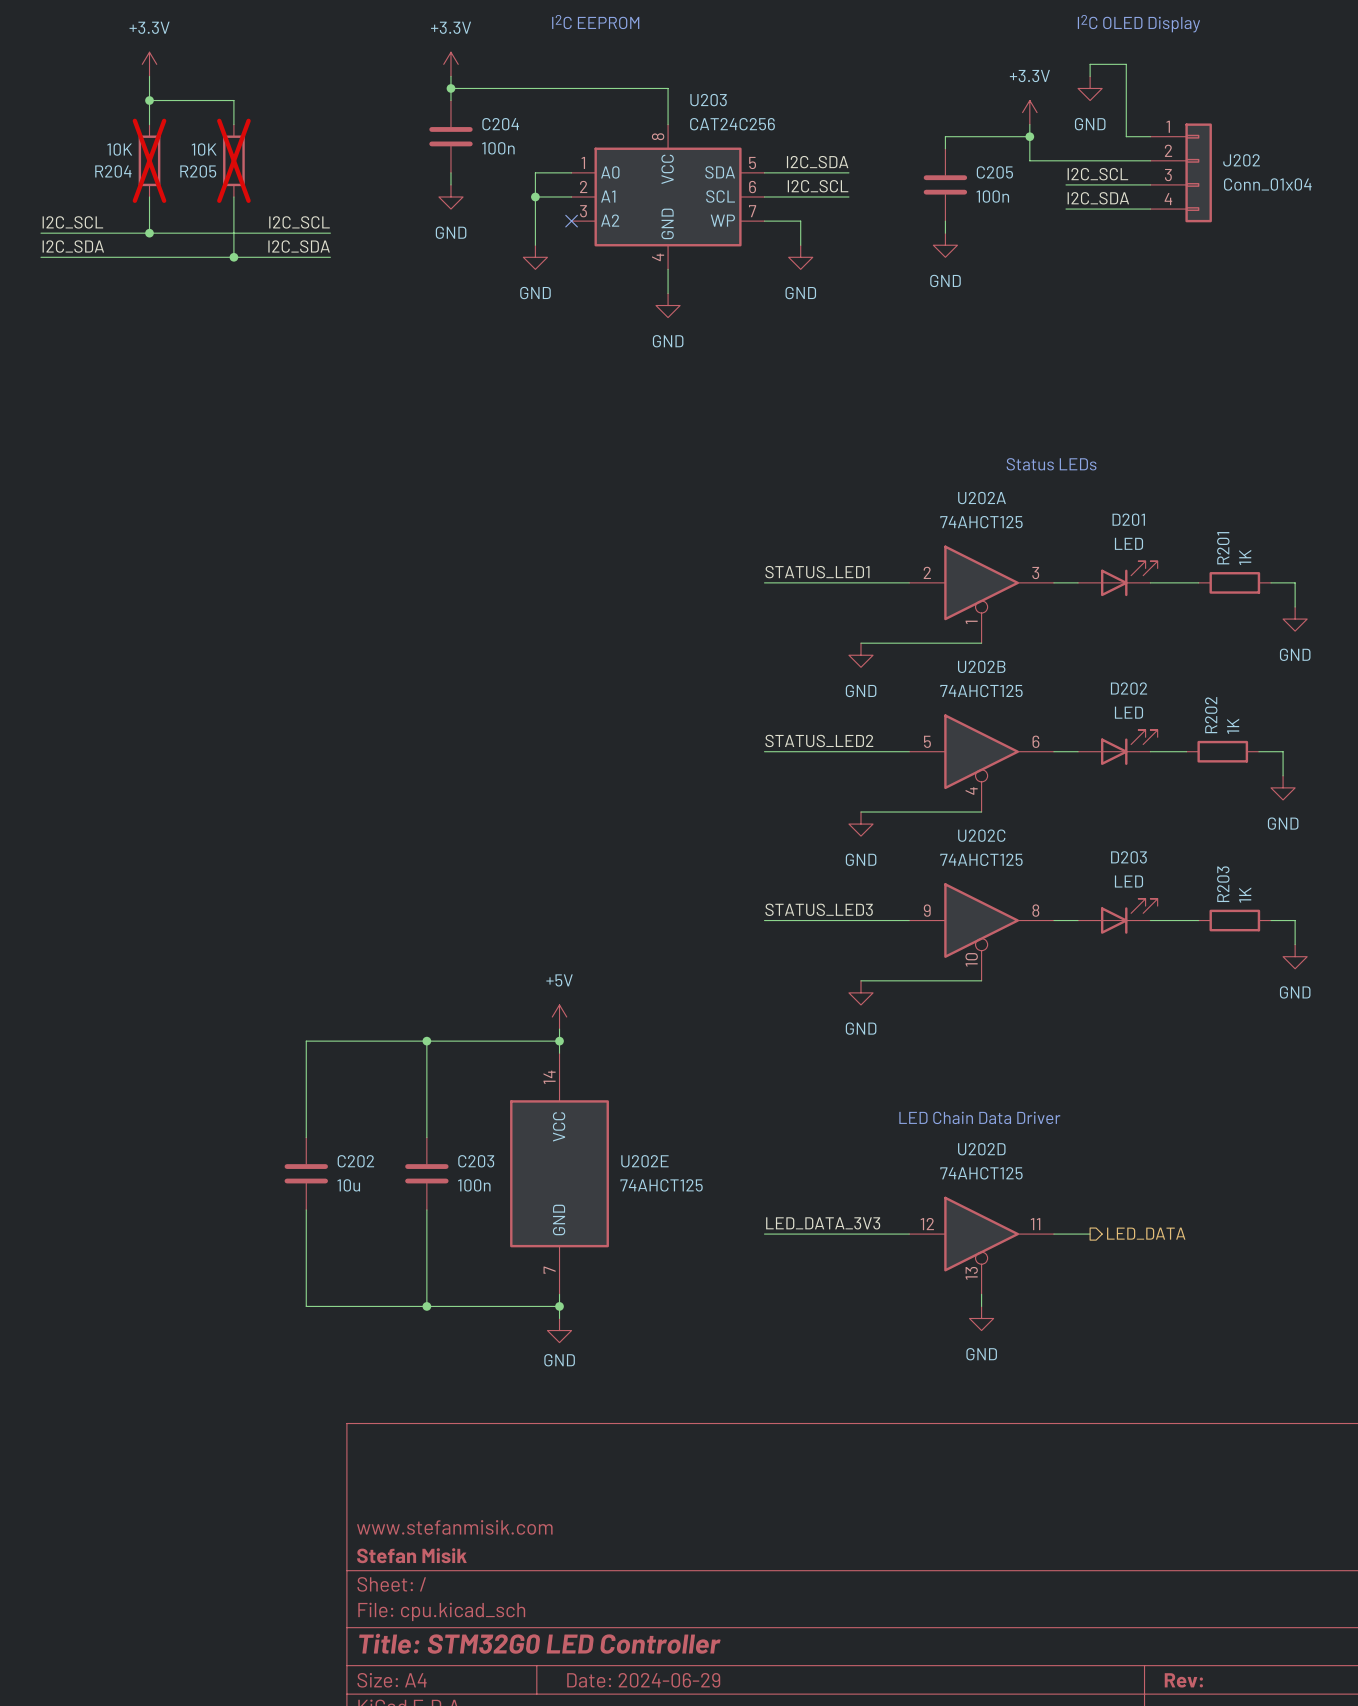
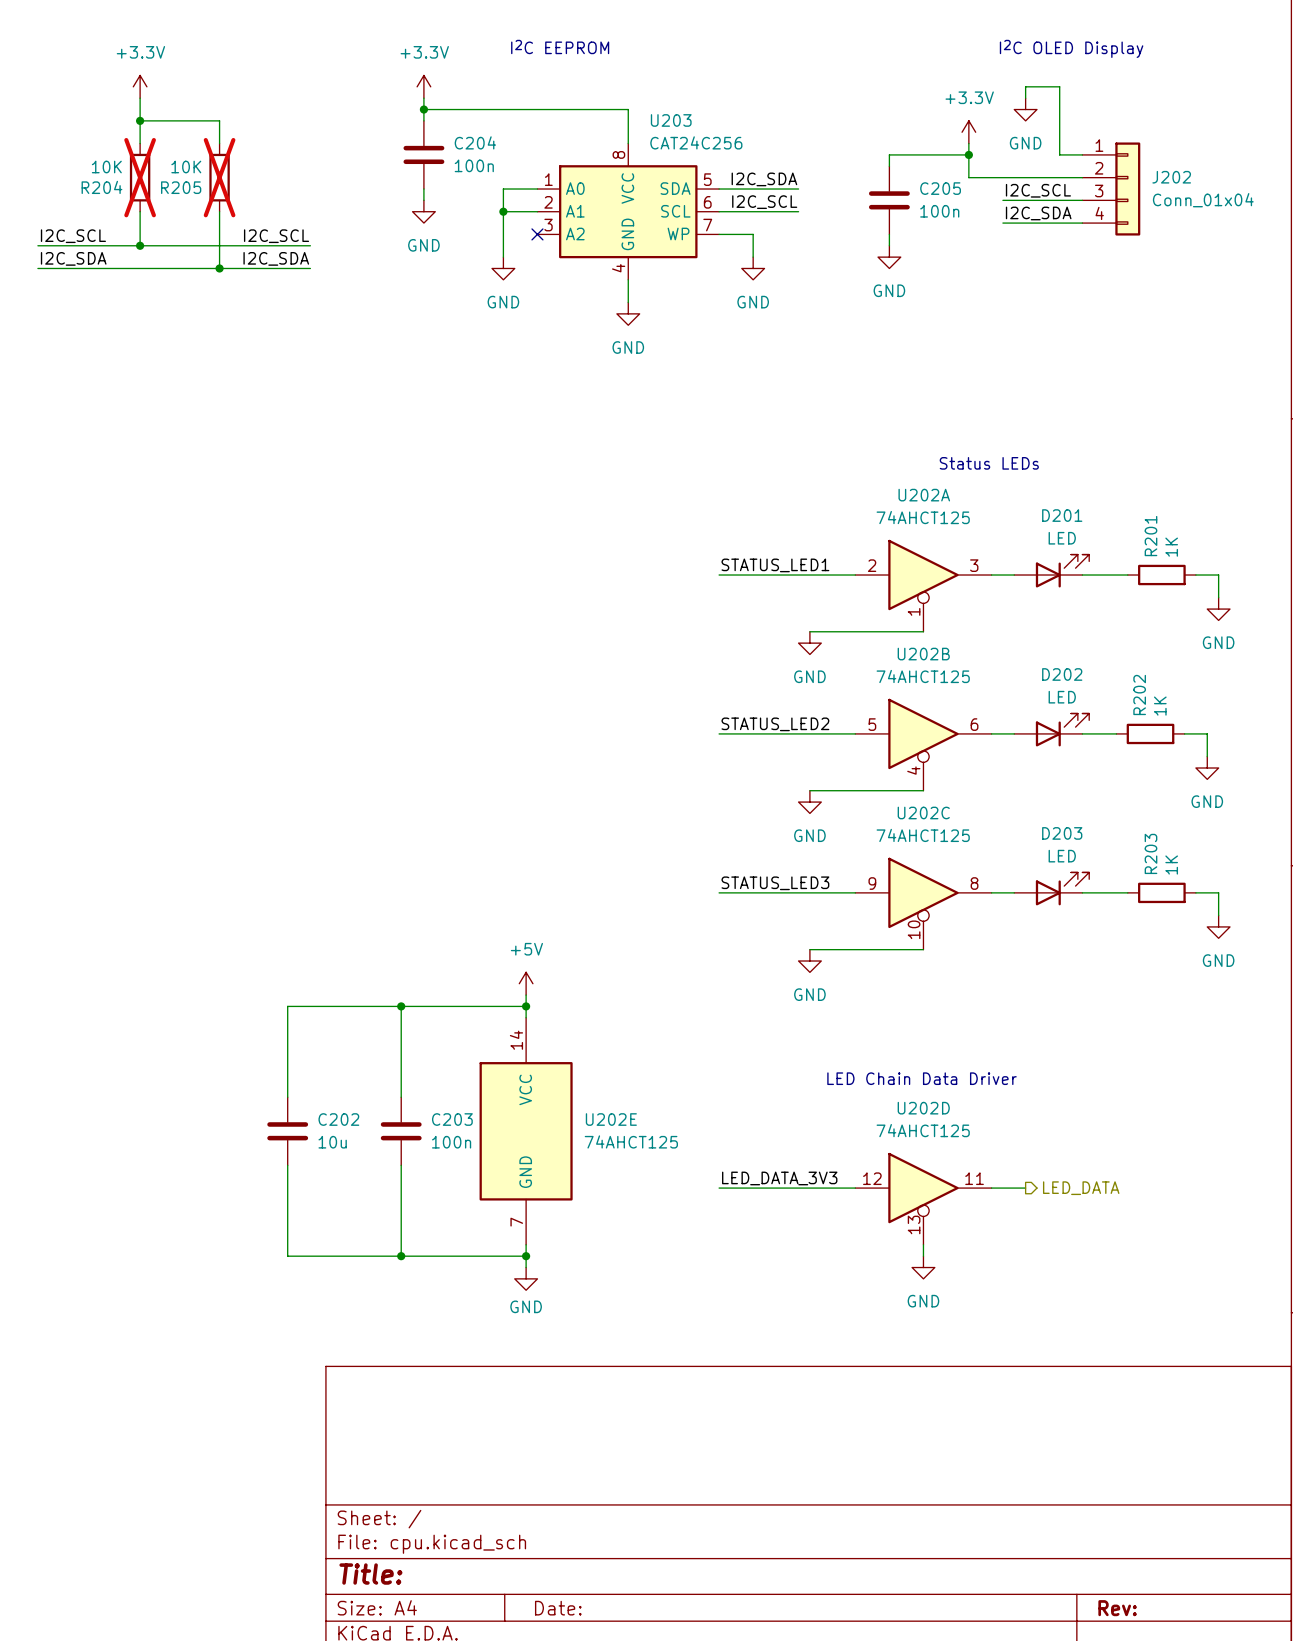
title block: www.stefanmisik.com (454, 1527) -> none
title block: Stefan Misik (411, 1555) -> none
title block: Title: STM32G0 LED Controller (539, 1643) -> Title: (370, 1574)
title block: Date: 2024-06-29 (643, 1680) -> Date: (558, 1608)

